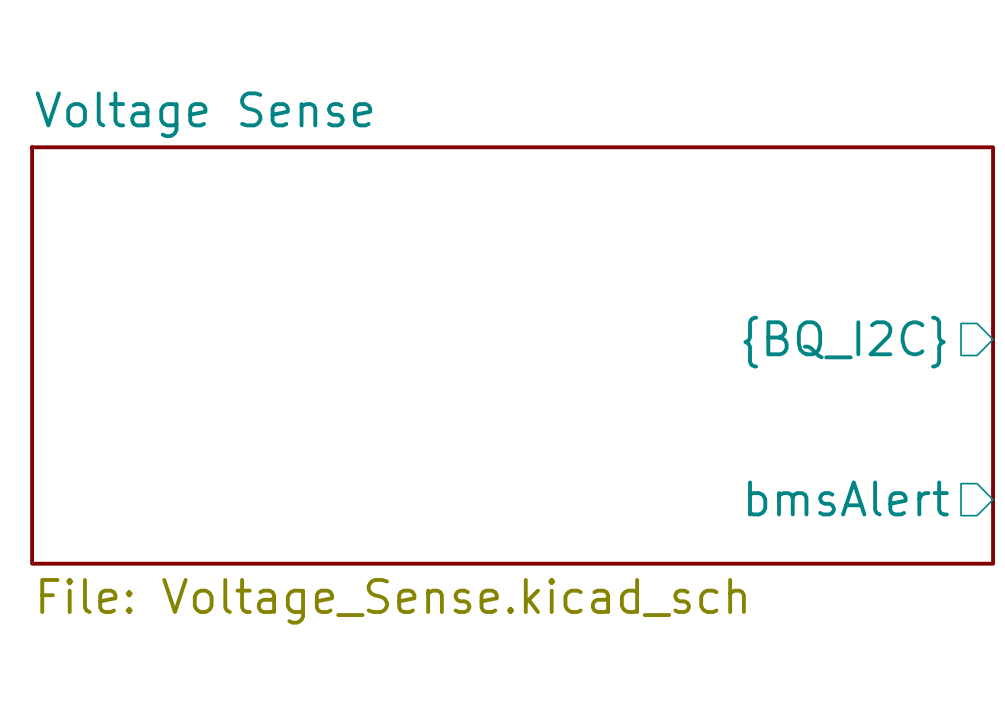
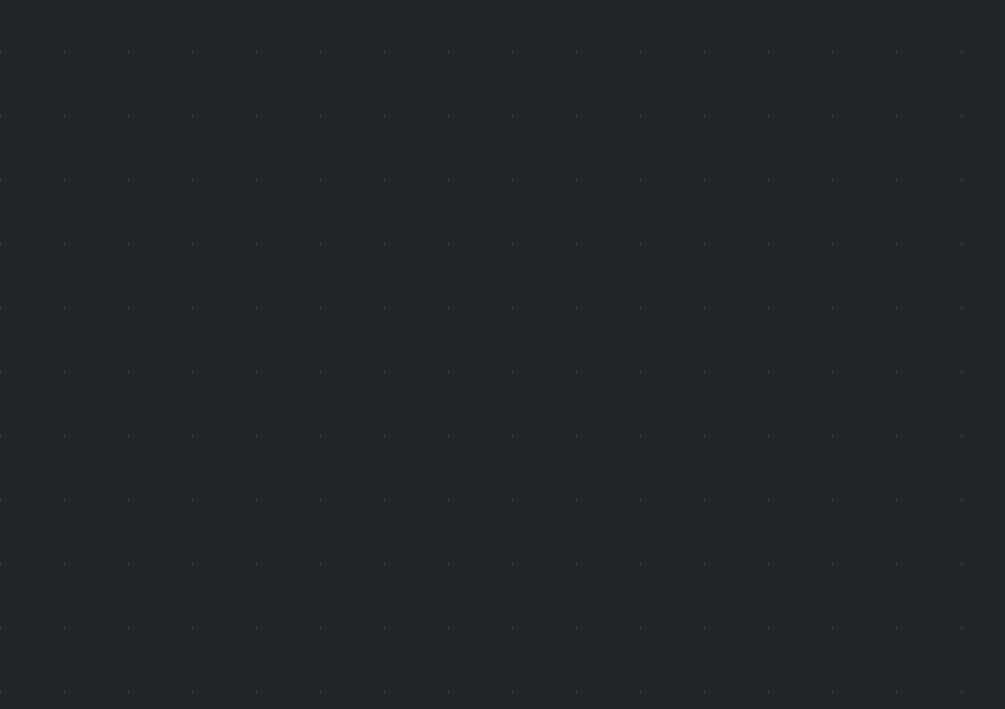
sheet pin: {BQ_I2C} (844, 342) -> none
sheet Voltage Sense: File: Voltage_Sense.kicad_sch (512, 355) -> none
sheet pin: bmsAlert (848, 498) -> none

